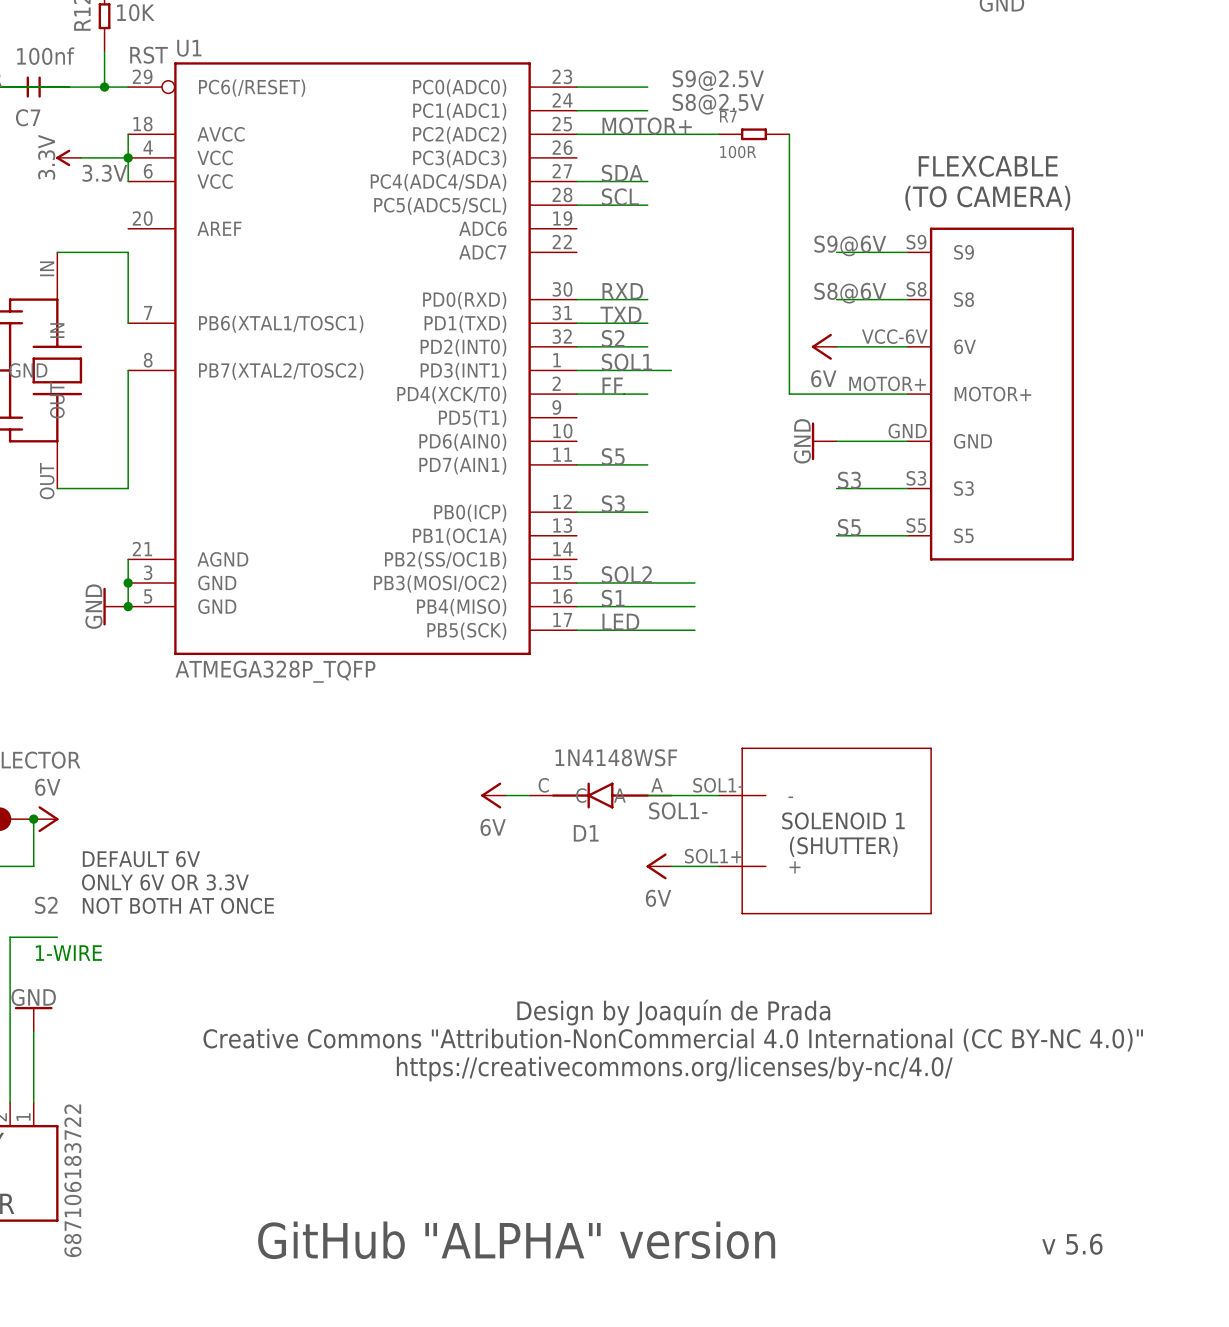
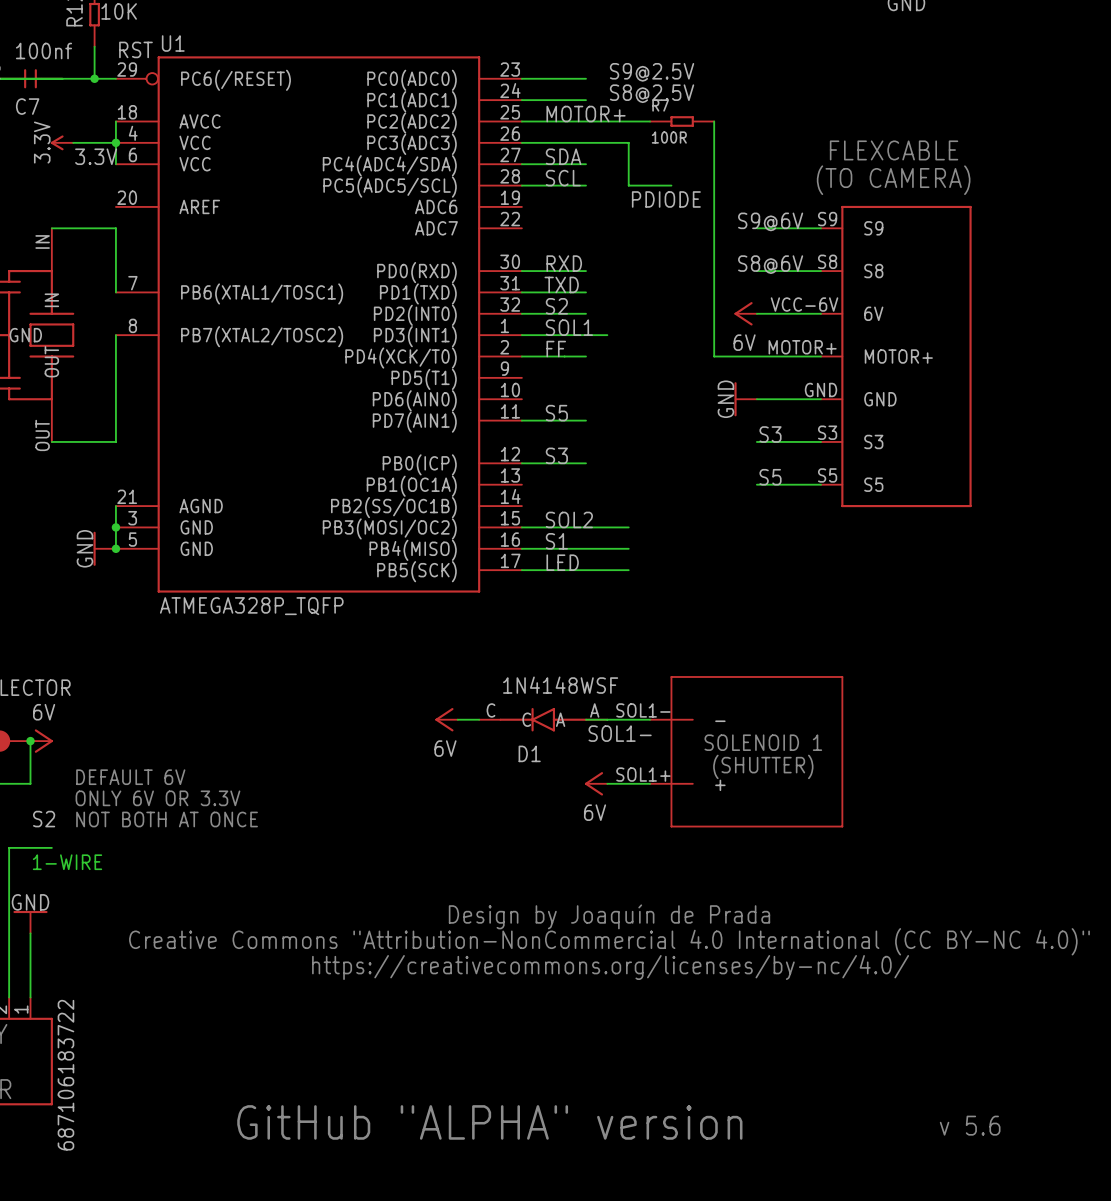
wire: none -> (521, 142) (628, 142) (628, 185) (671, 185)
label: none -> PDIODE (666, 199)

